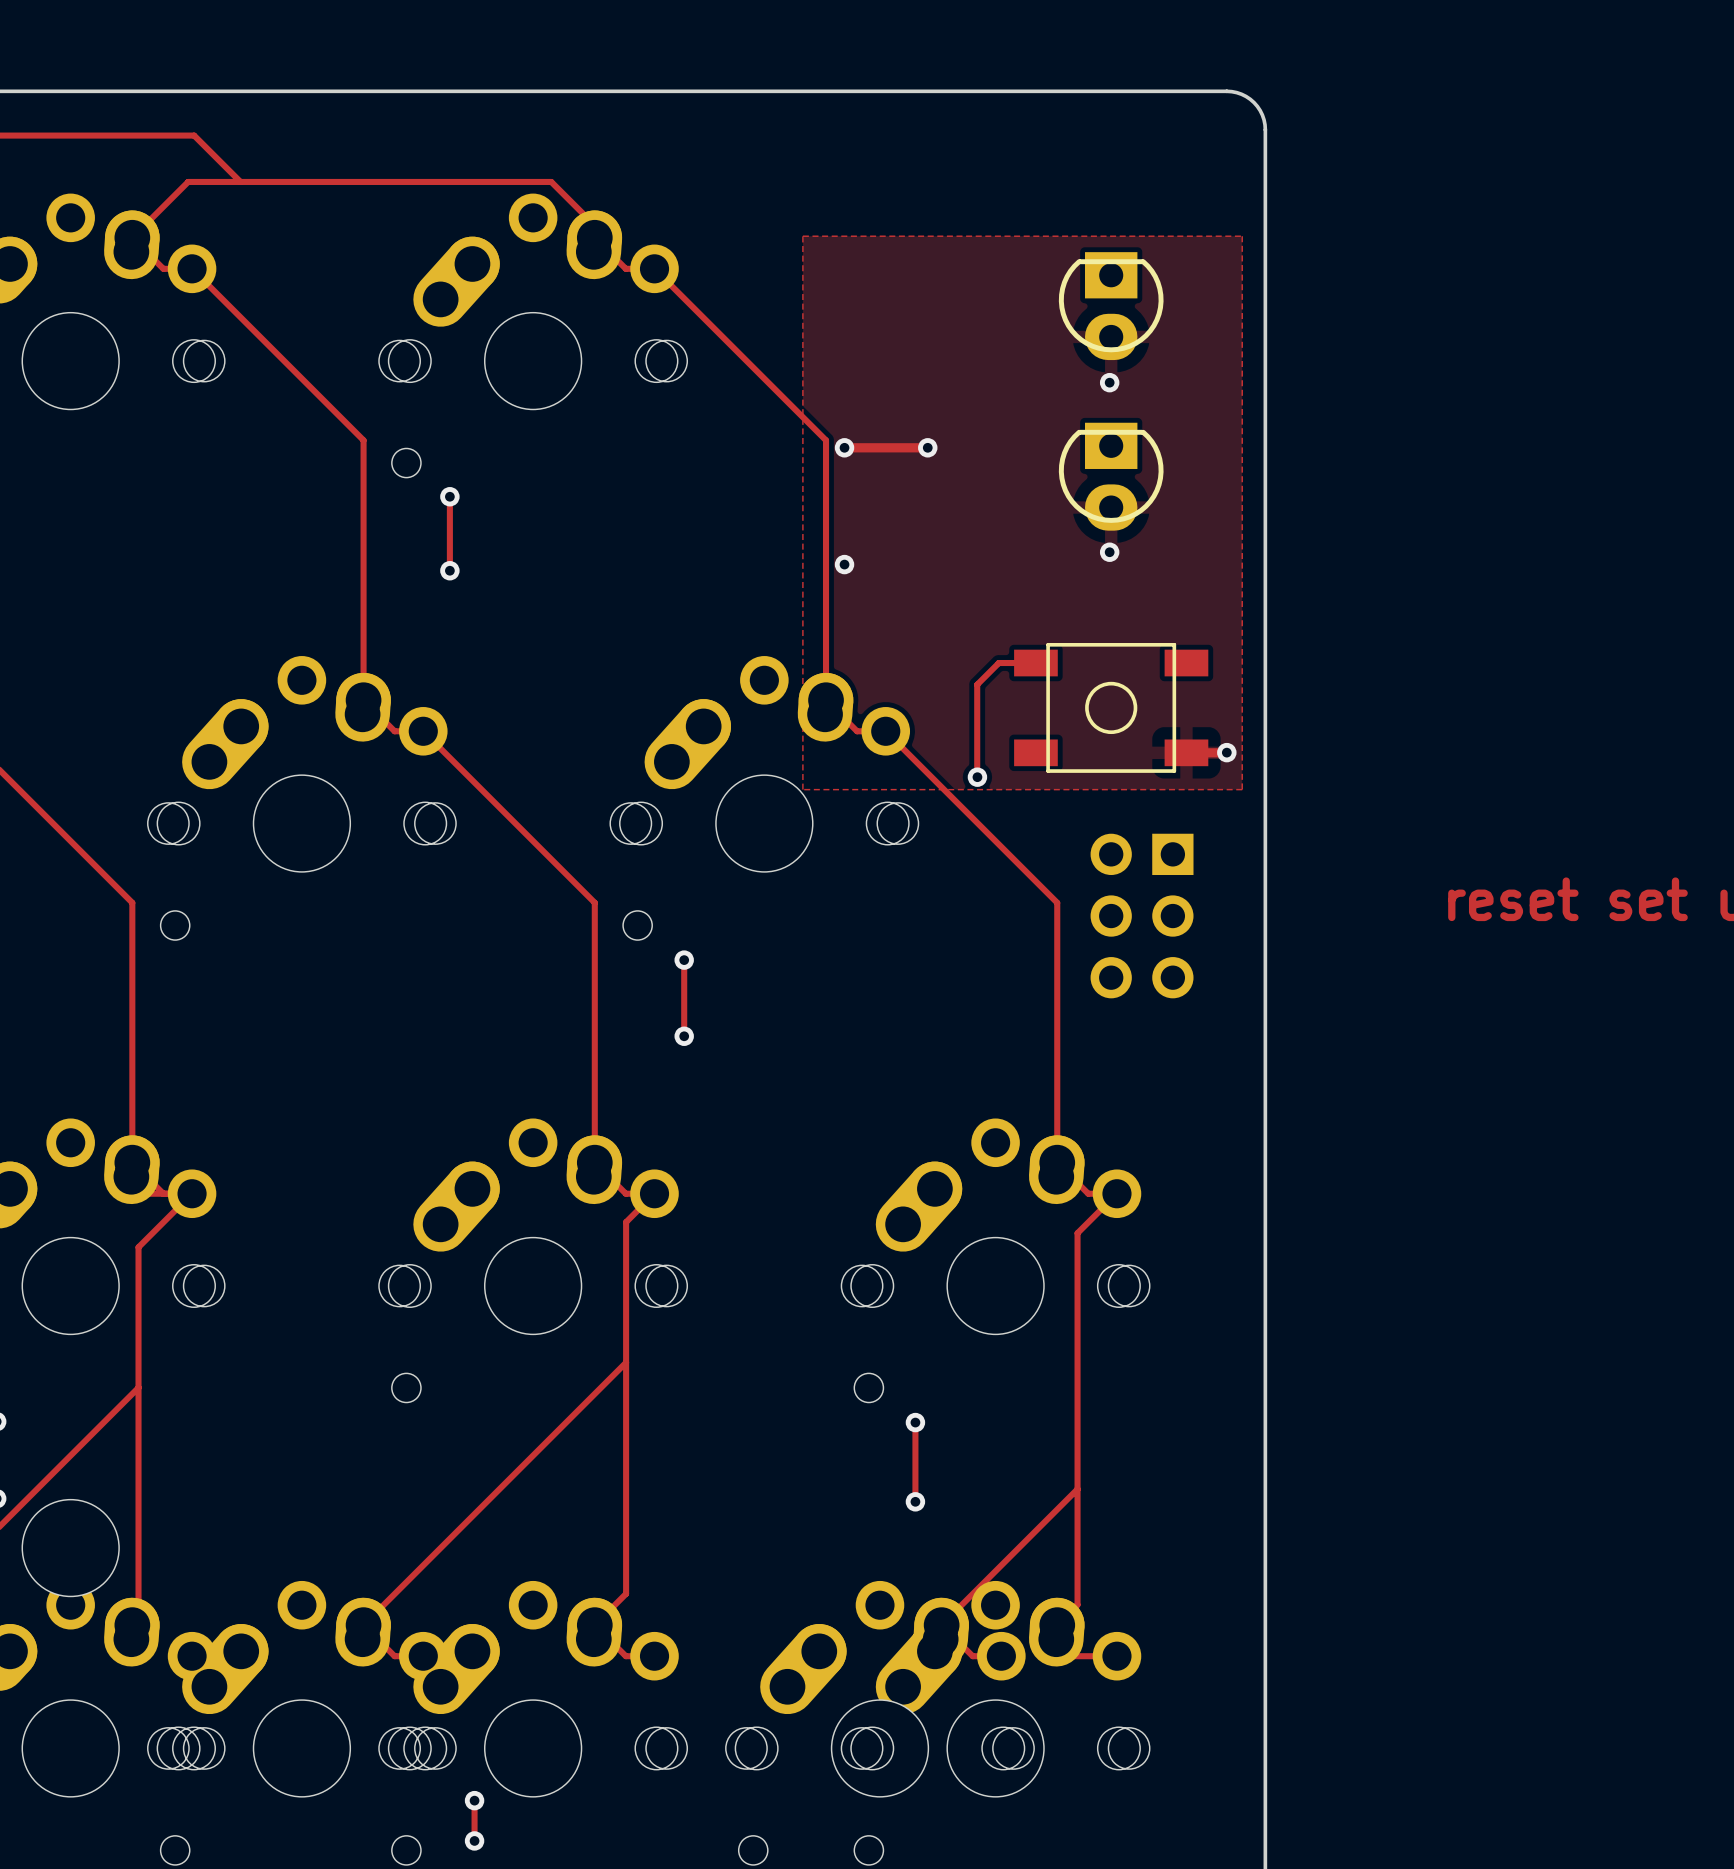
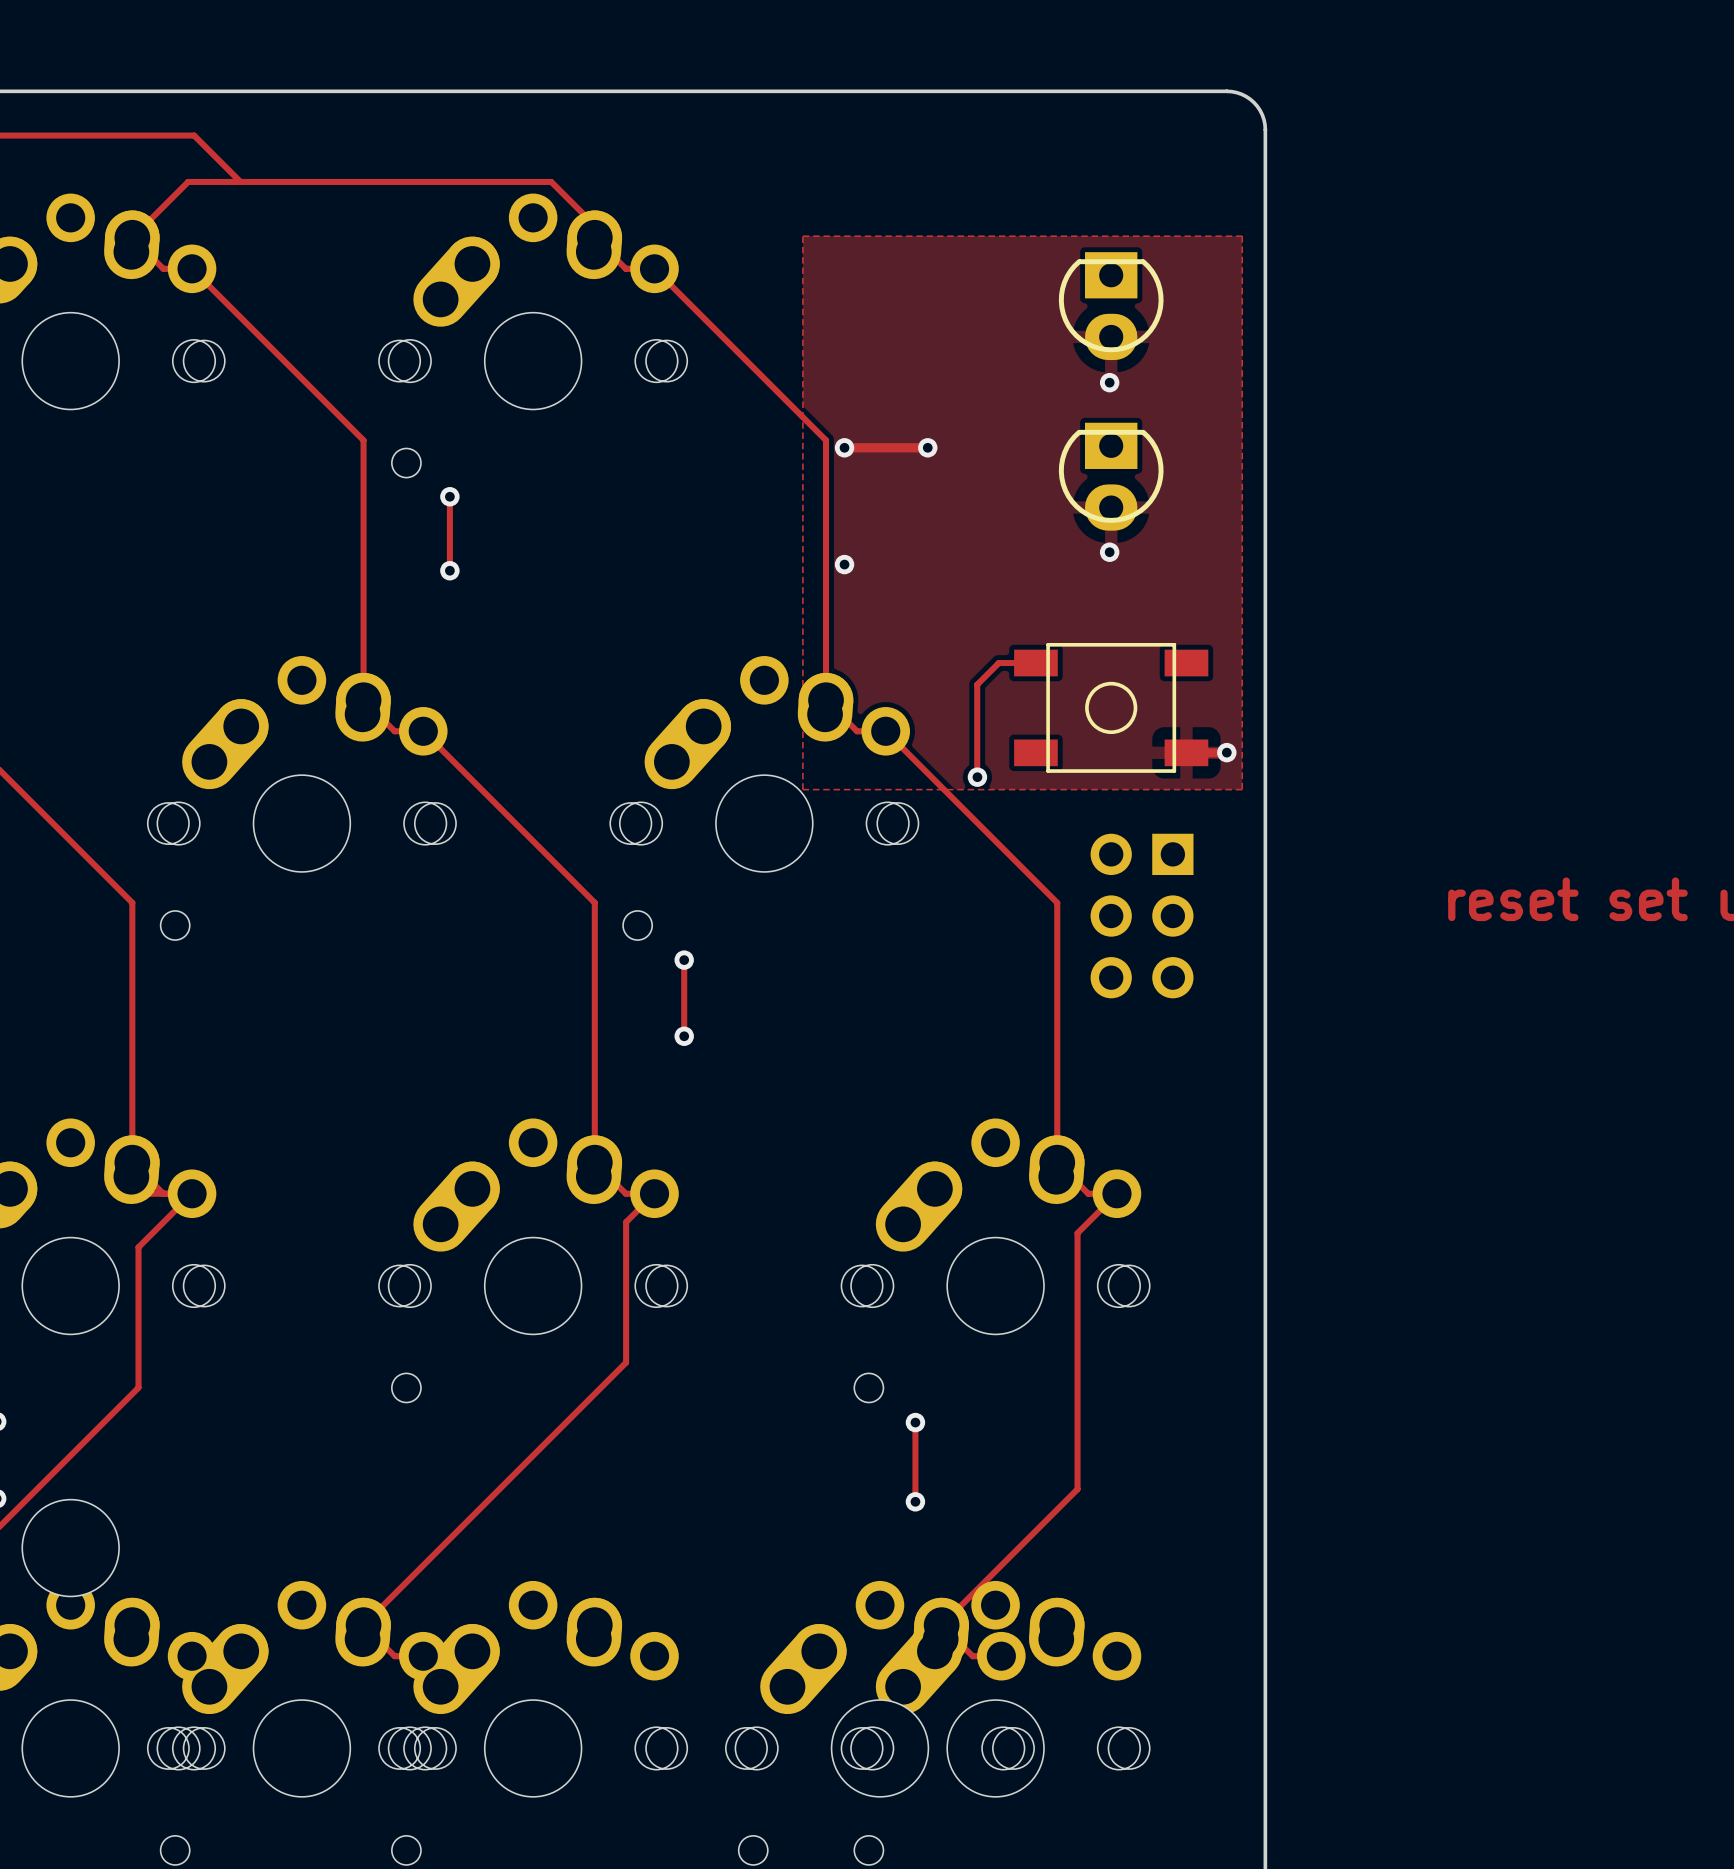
track: (626, 1362) (626, 1593) (594, 1625) (625, 1656) (654, 1656) -> none
track: (138, 1387) (138, 1618) (132, 1625) -> none
track: (1077, 1489) (1077, 1604) (1057, 1625) (1056, 1639) (1073, 1656) (1116, 1656) -> none
track: (474, 1800) (474, 1840) -> none
via: (474, 1800) -> none
via: (474, 1840) -> none

